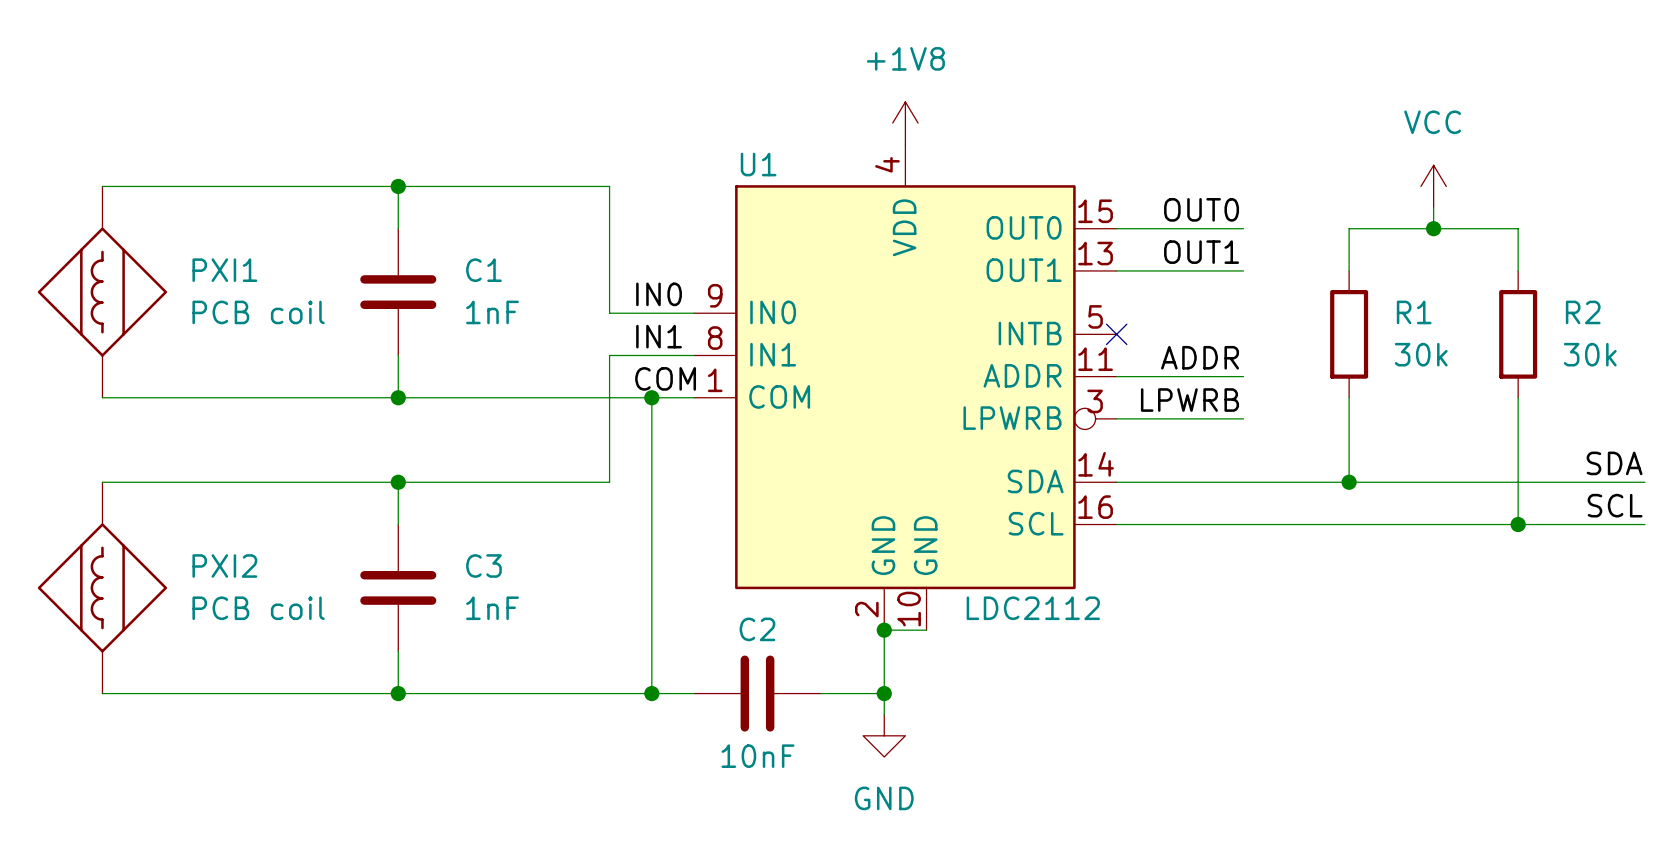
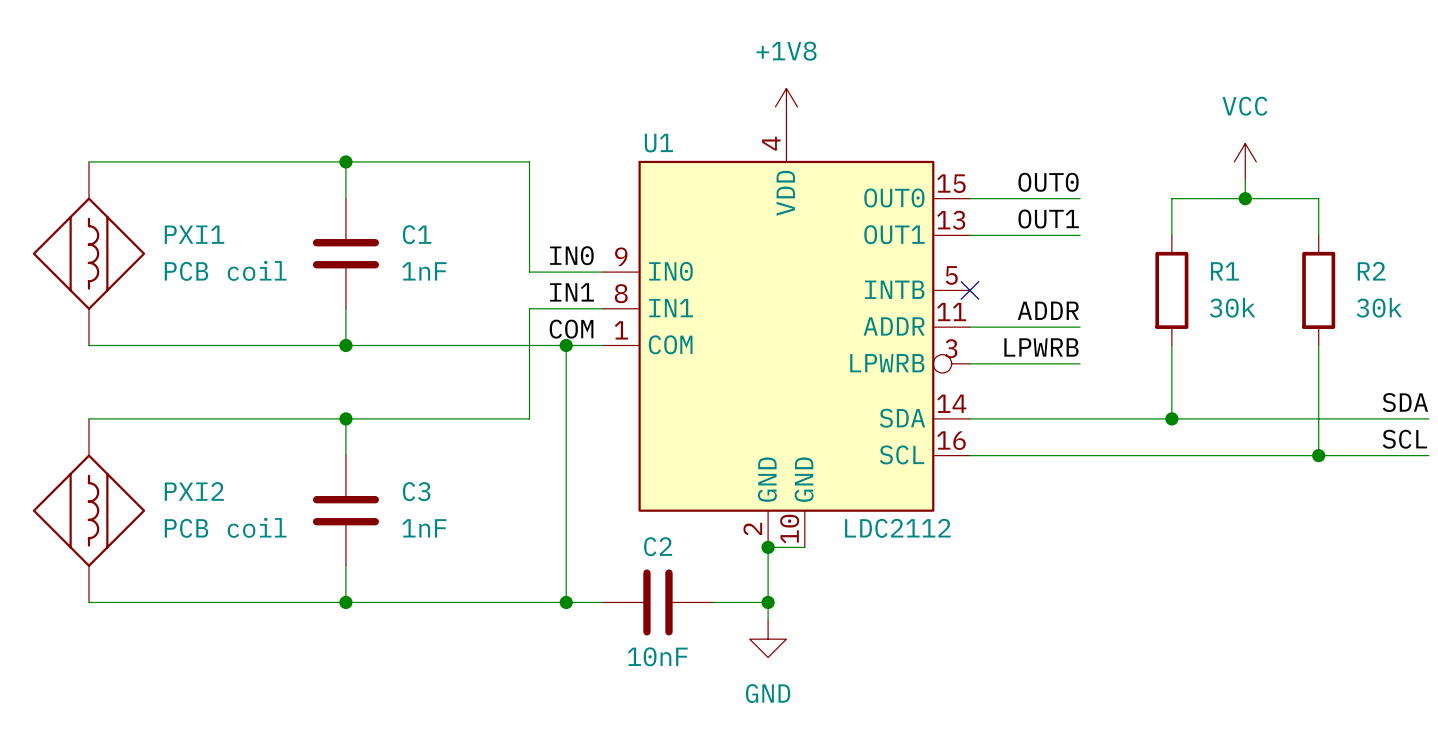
PXI1 symbol: [37, 186, 168, 398] -> [32, 161, 146, 346]
PXI2 symbol: [37, 482, 168, 694] -> [32, 418, 146, 603]

